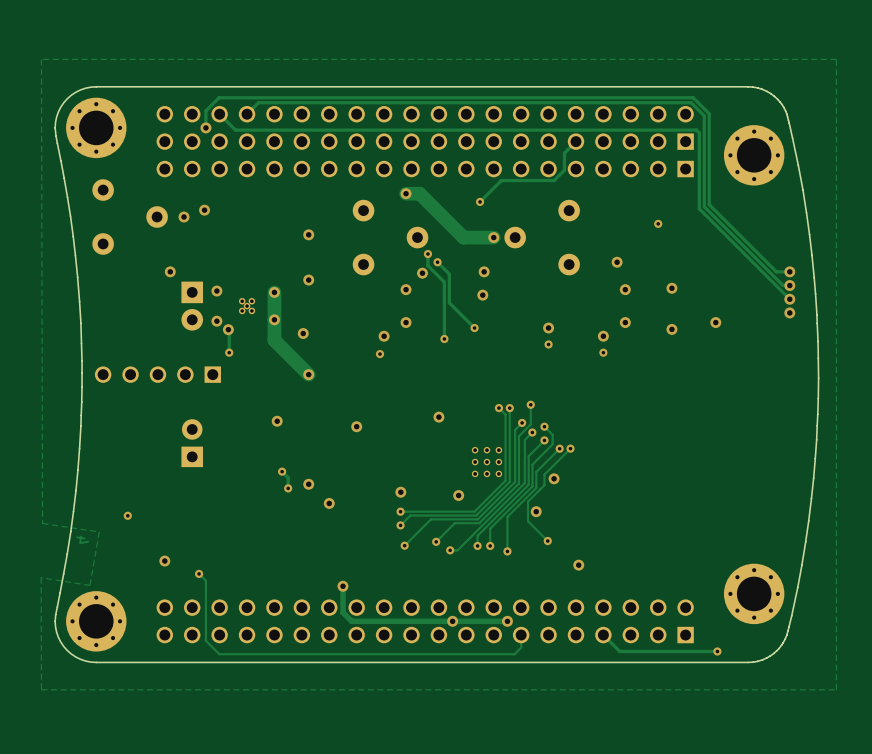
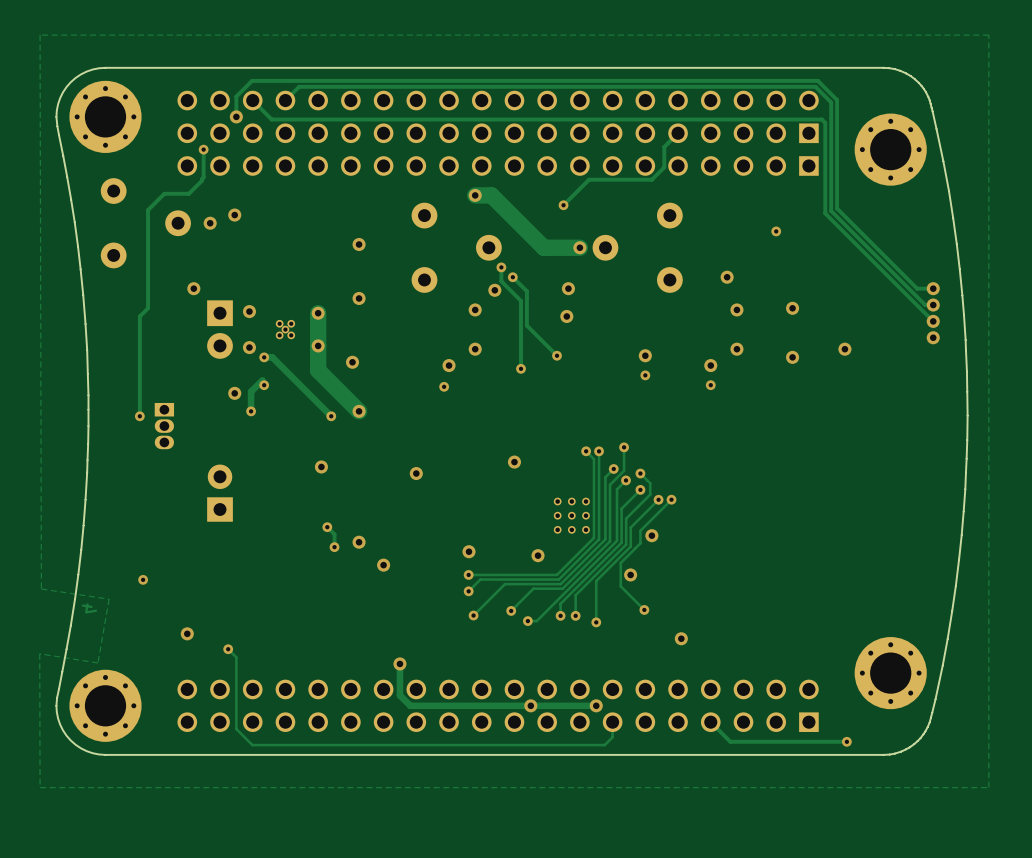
track: none -> (203, 149) (202, 180) (188, 193) (164, 193) (148, 210) (148, 308) (139, 316) (139, 416)
via: none -> (203, 149)
track: (228, 329) (229, 352) -> none
via position: (228, 329) -> (234, 393)
track: none -> (264, 357) (272, 357) (331, 416)
via: none -> (264, 357)
track: none -> (262, 380) (251, 391) (251, 411)
part: (157, 374) -> none
via: none -> (251, 411)
via: none -> (139, 416)
via: none -> (331, 416)
part: none -> (164, 426)

